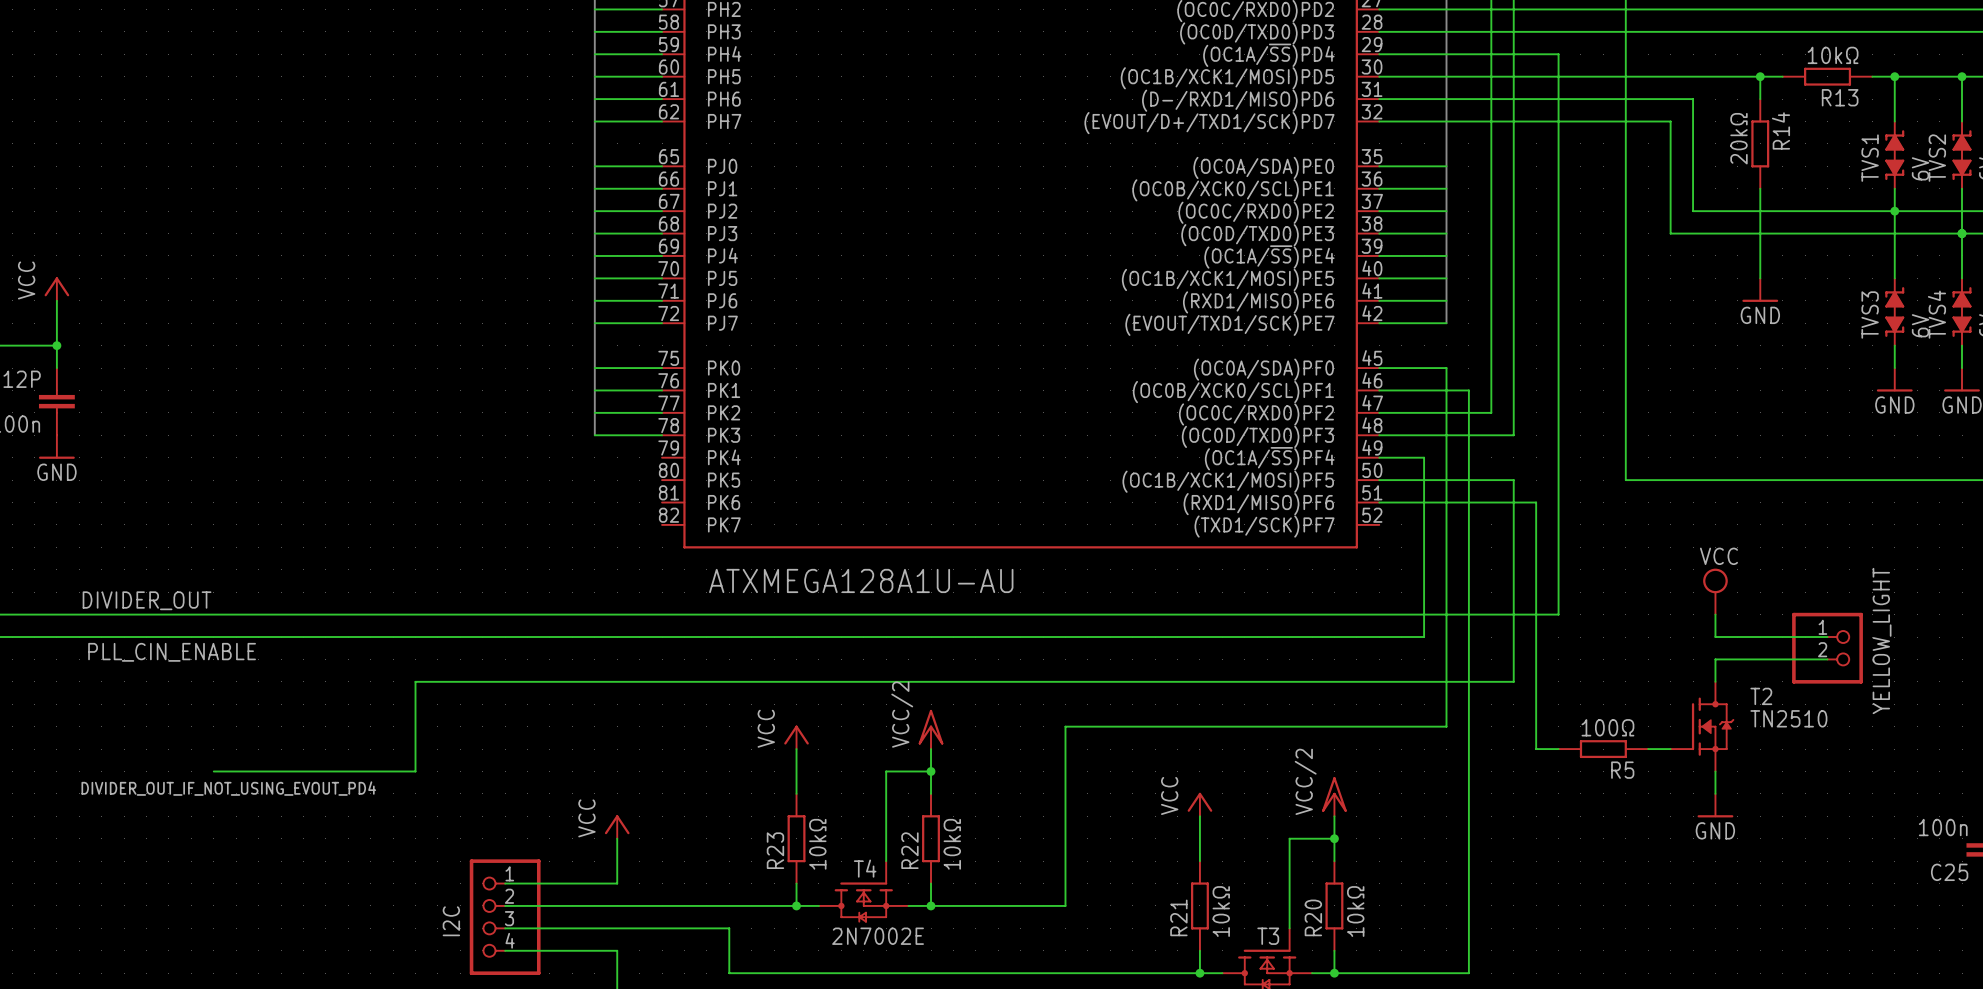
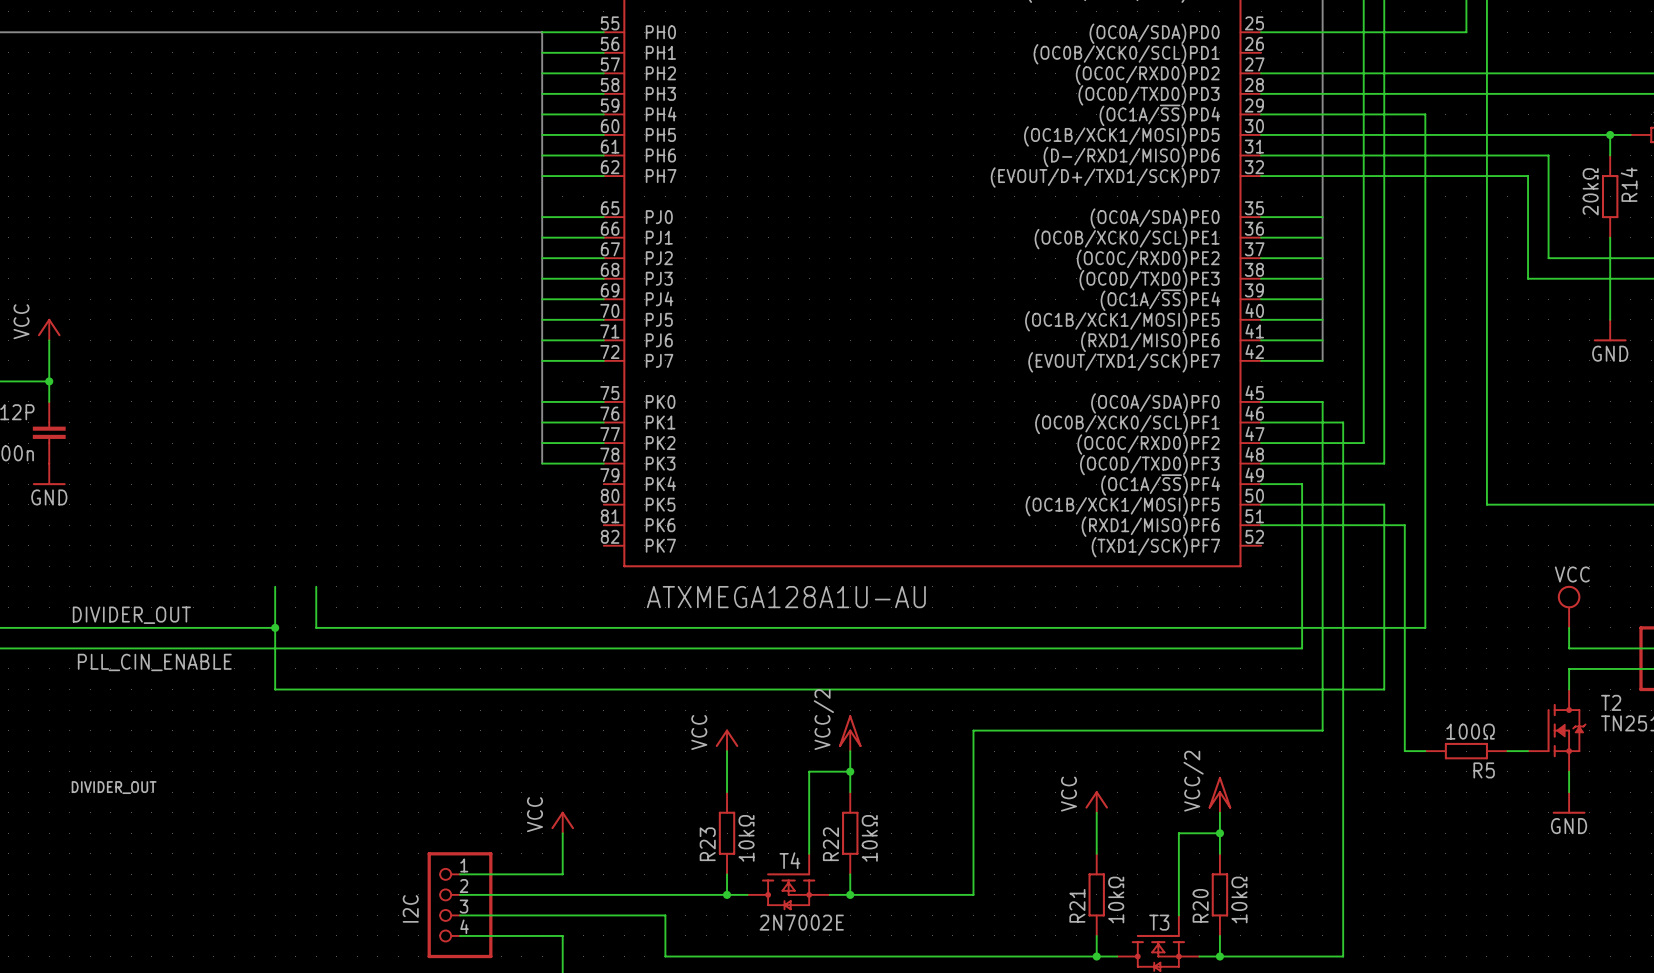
wire: (303, 614) (348, 614) -> (316, 586) (316, 627)
junction: none -> (275, 627)
wire: (415, 681) (415, 771) (213, 771) -> (377, 689) (275, 689) (275, 586)
label: DIVIDER_OUT_IF_NOT_USING_EVOUT_PD4 (228, 788) -> DIVIDER_OUT (114, 787)

